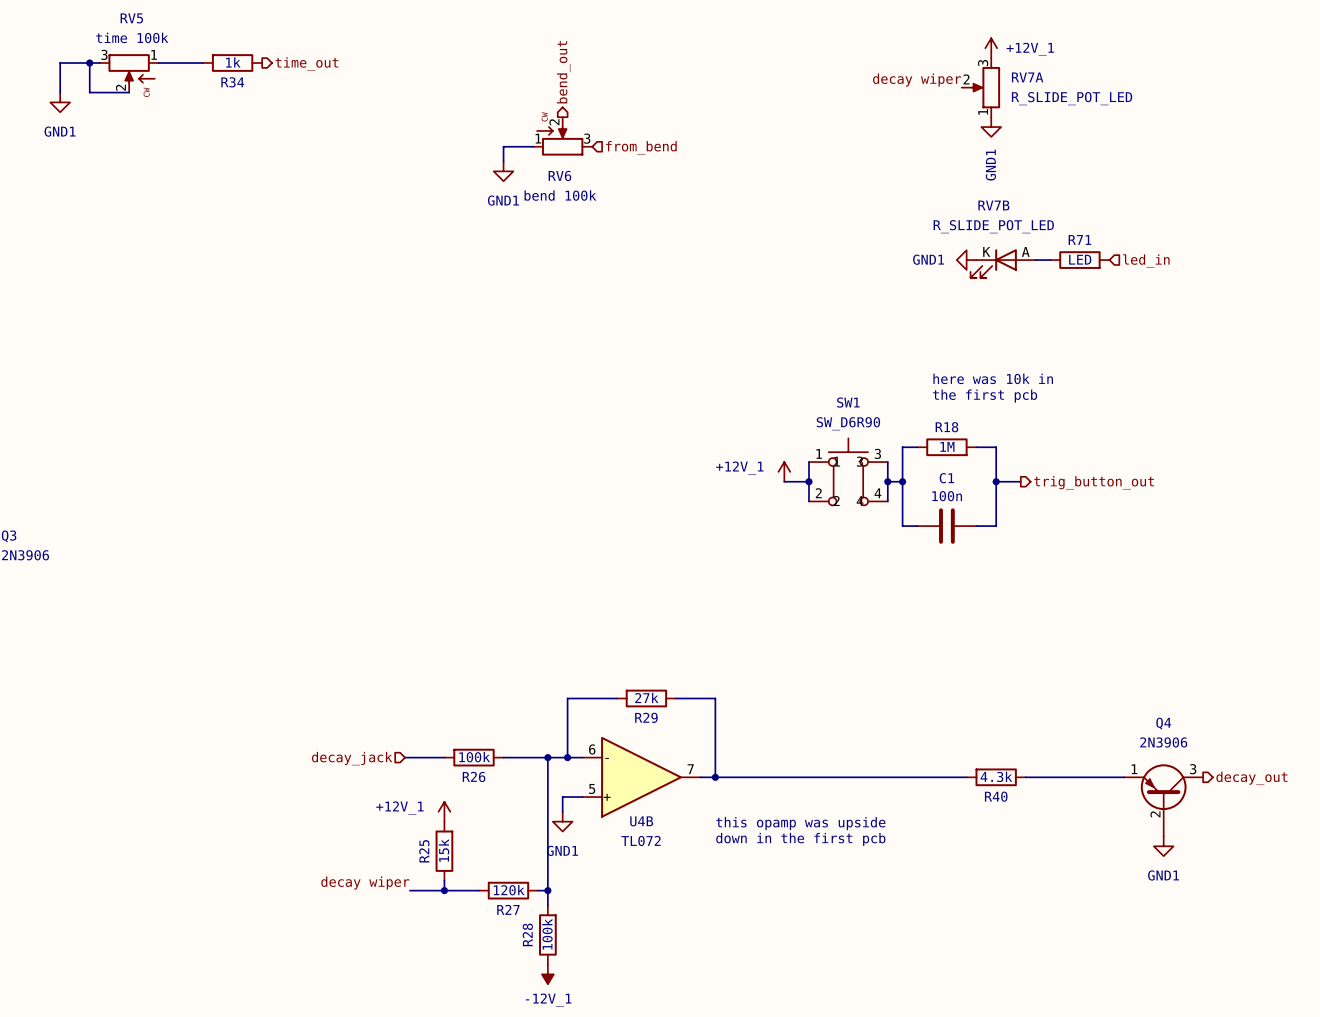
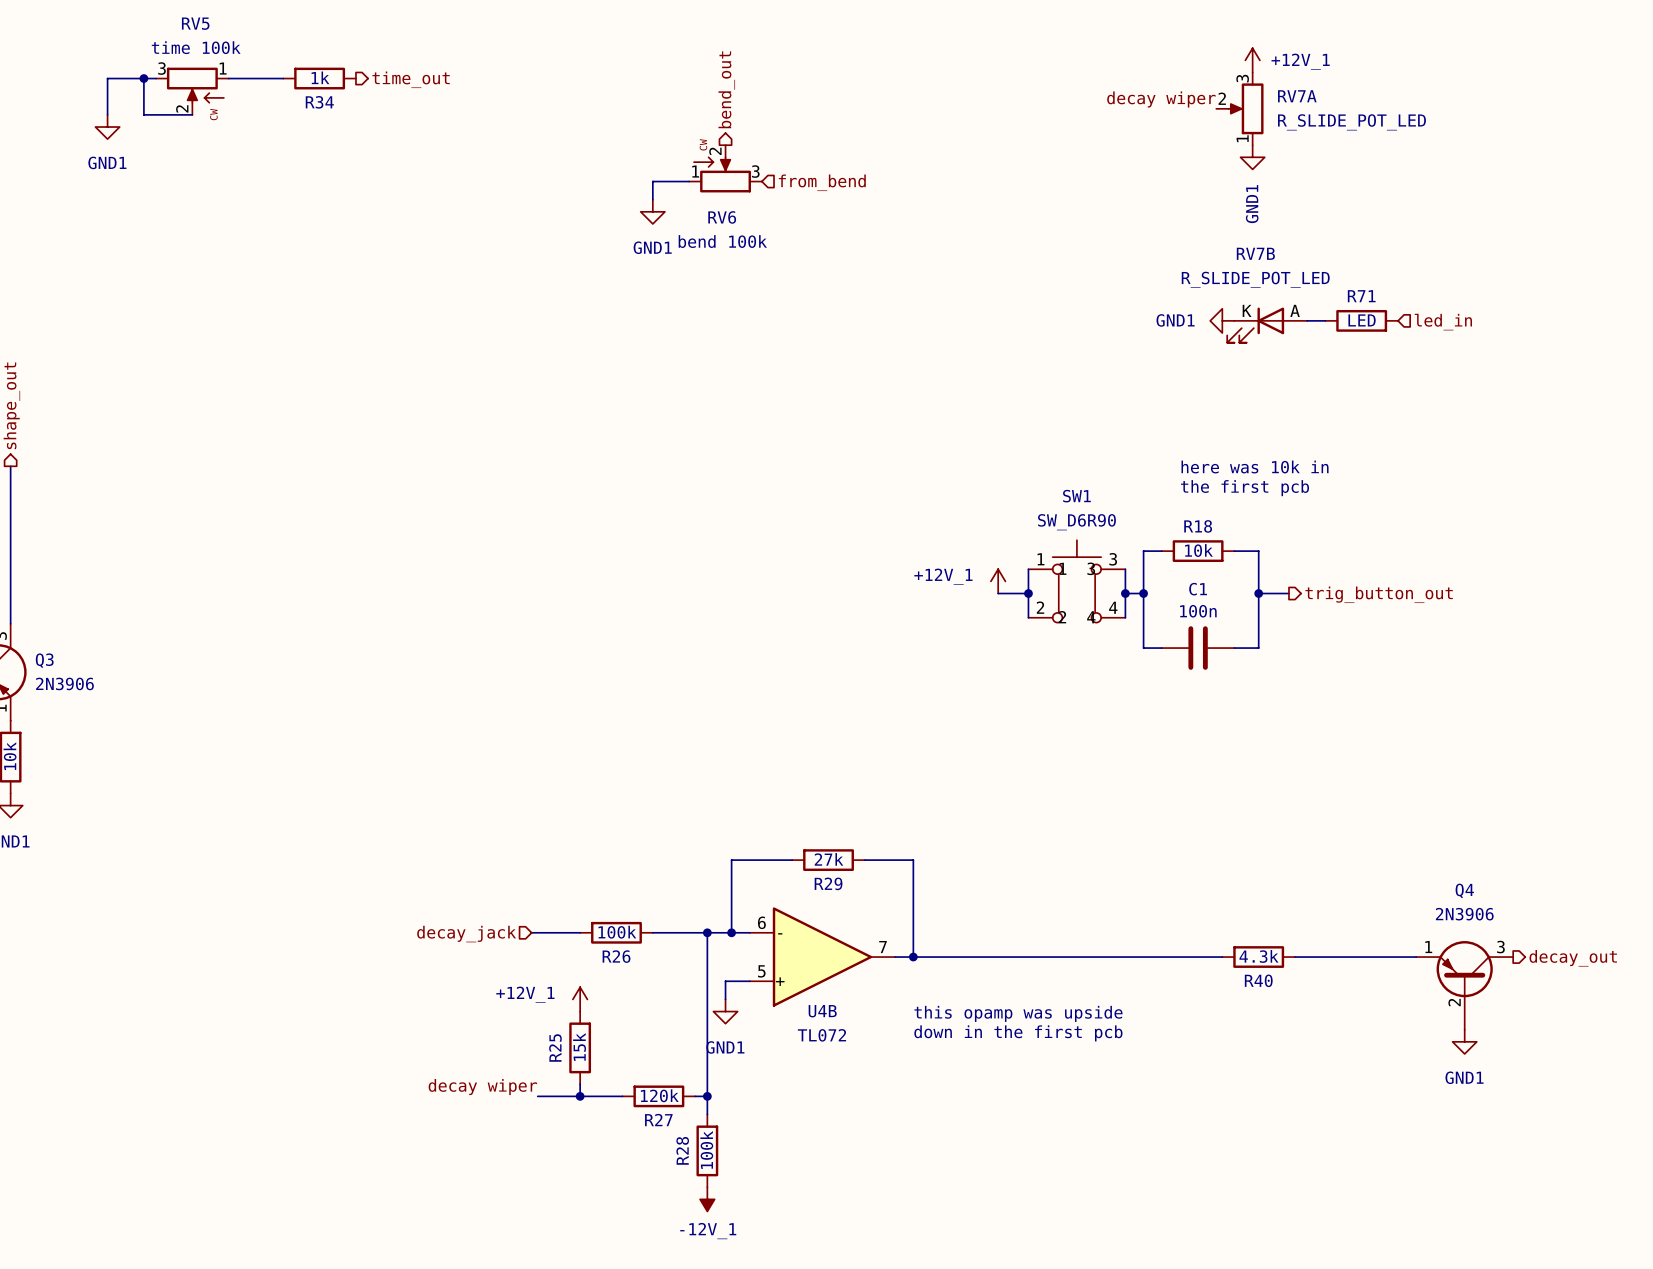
R18 value: 1M (947, 446) -> 10k (1198, 550)

